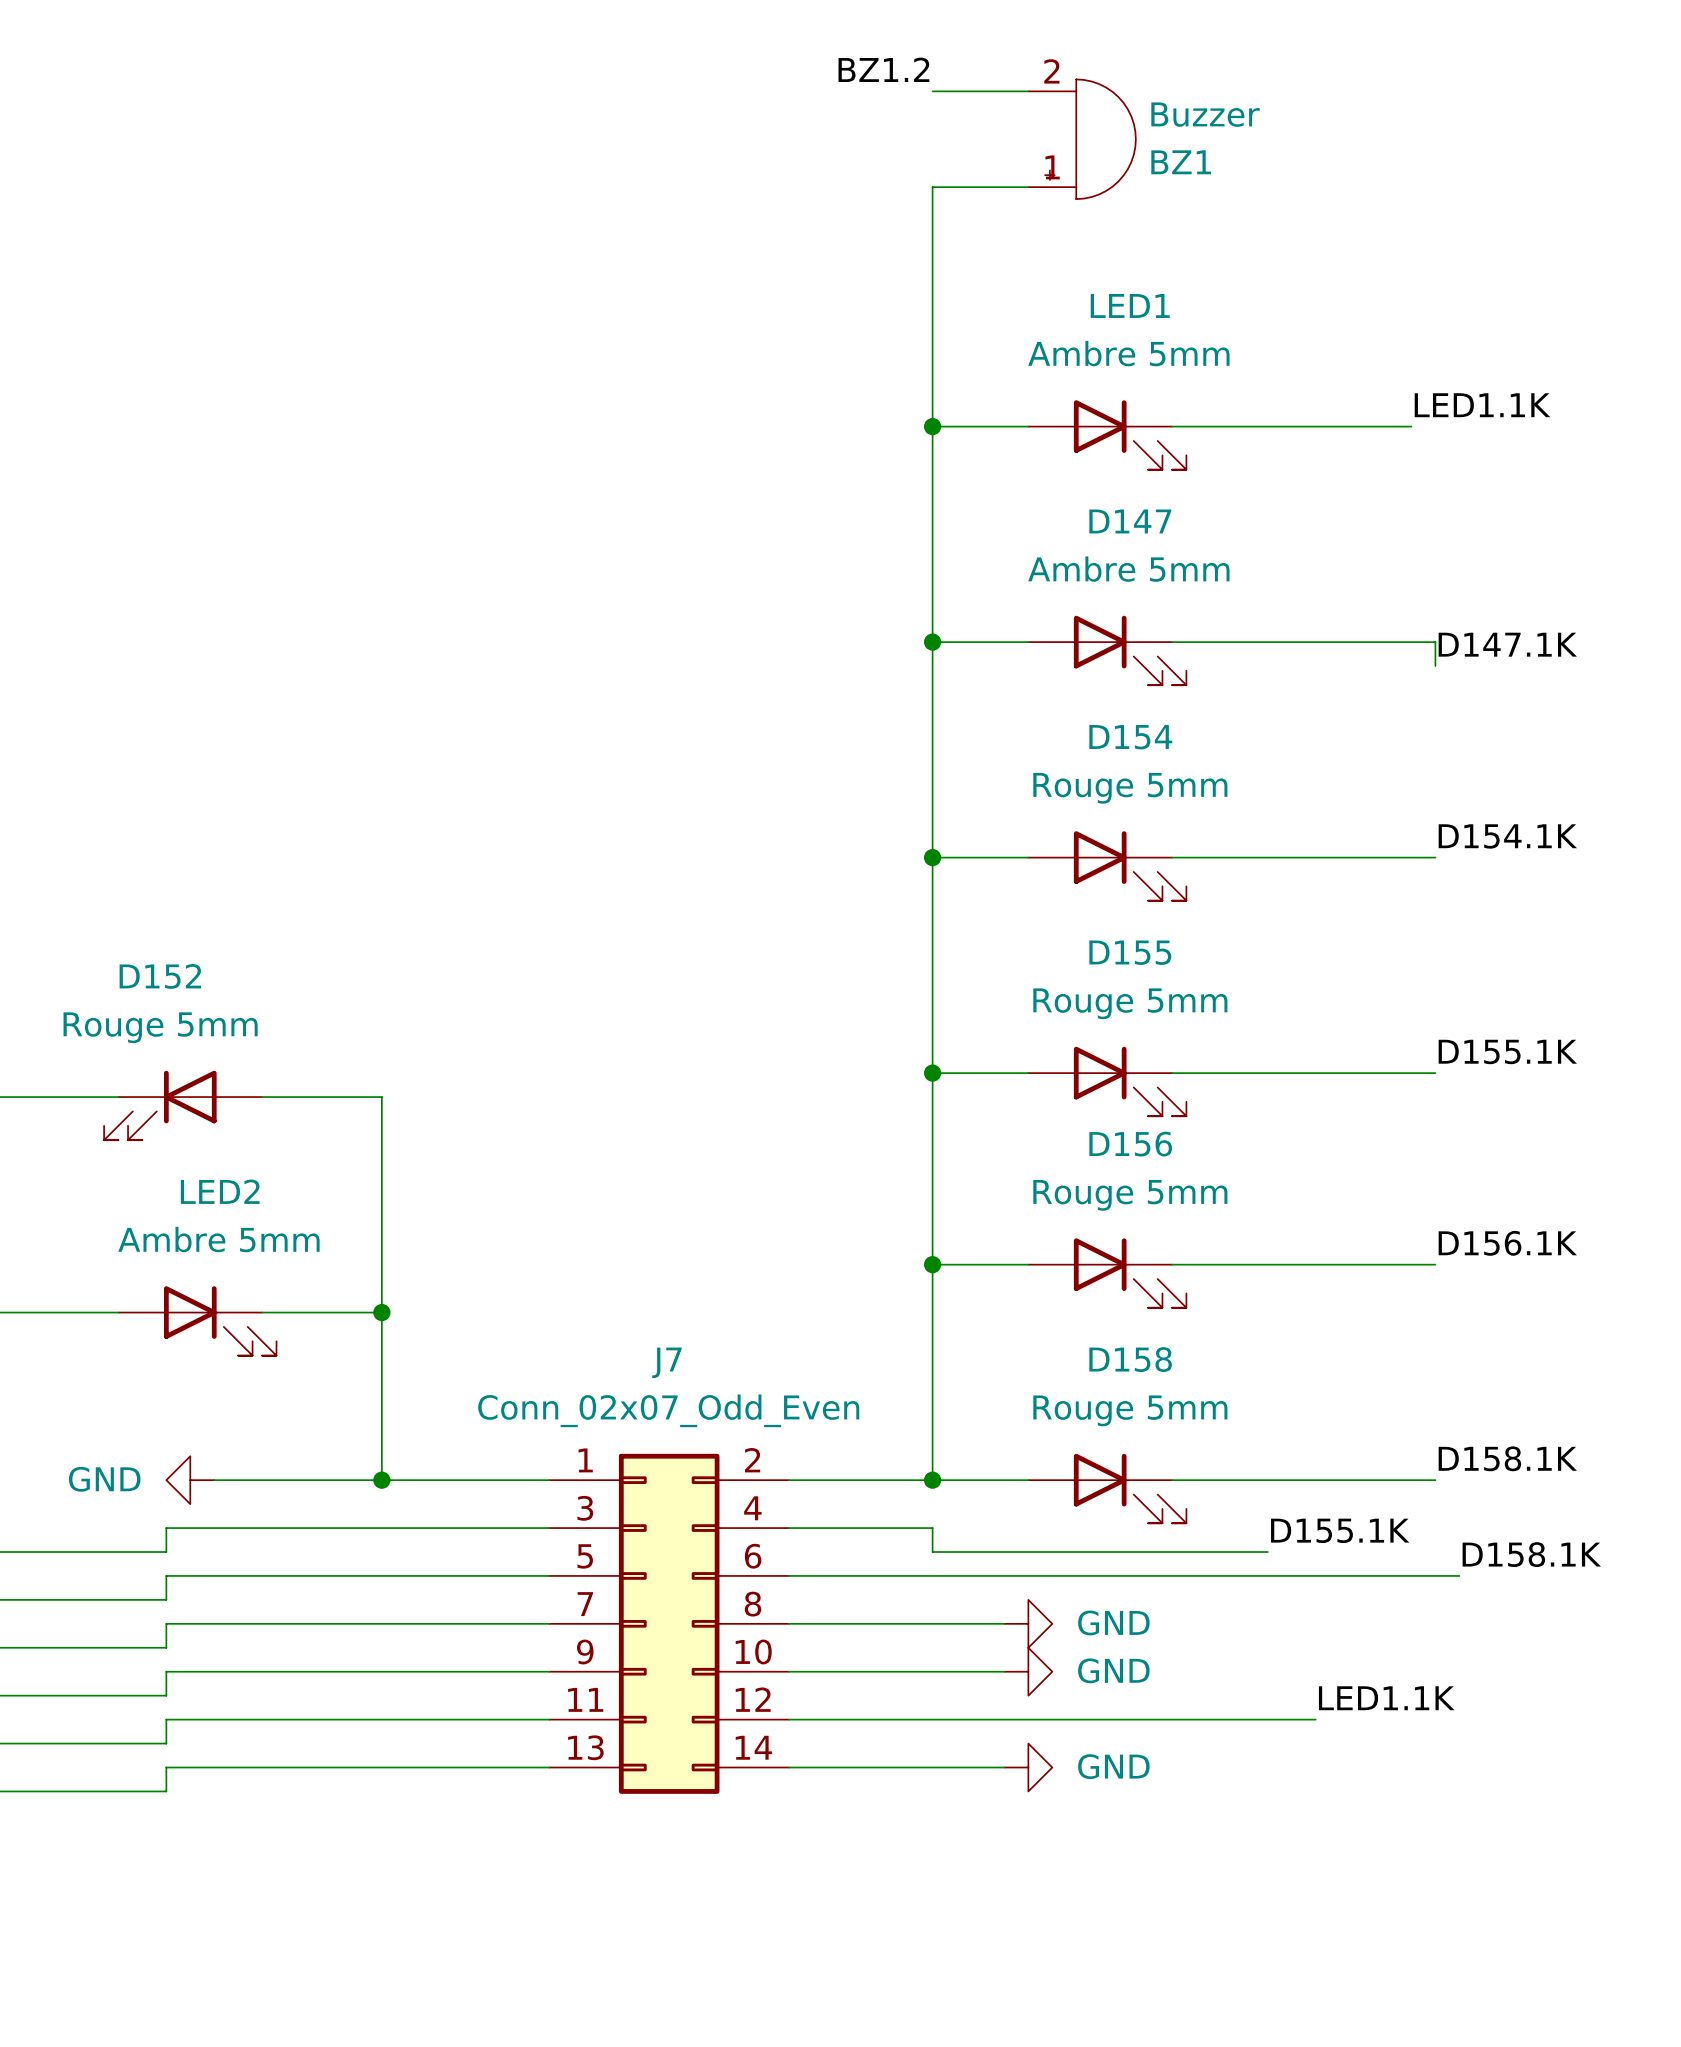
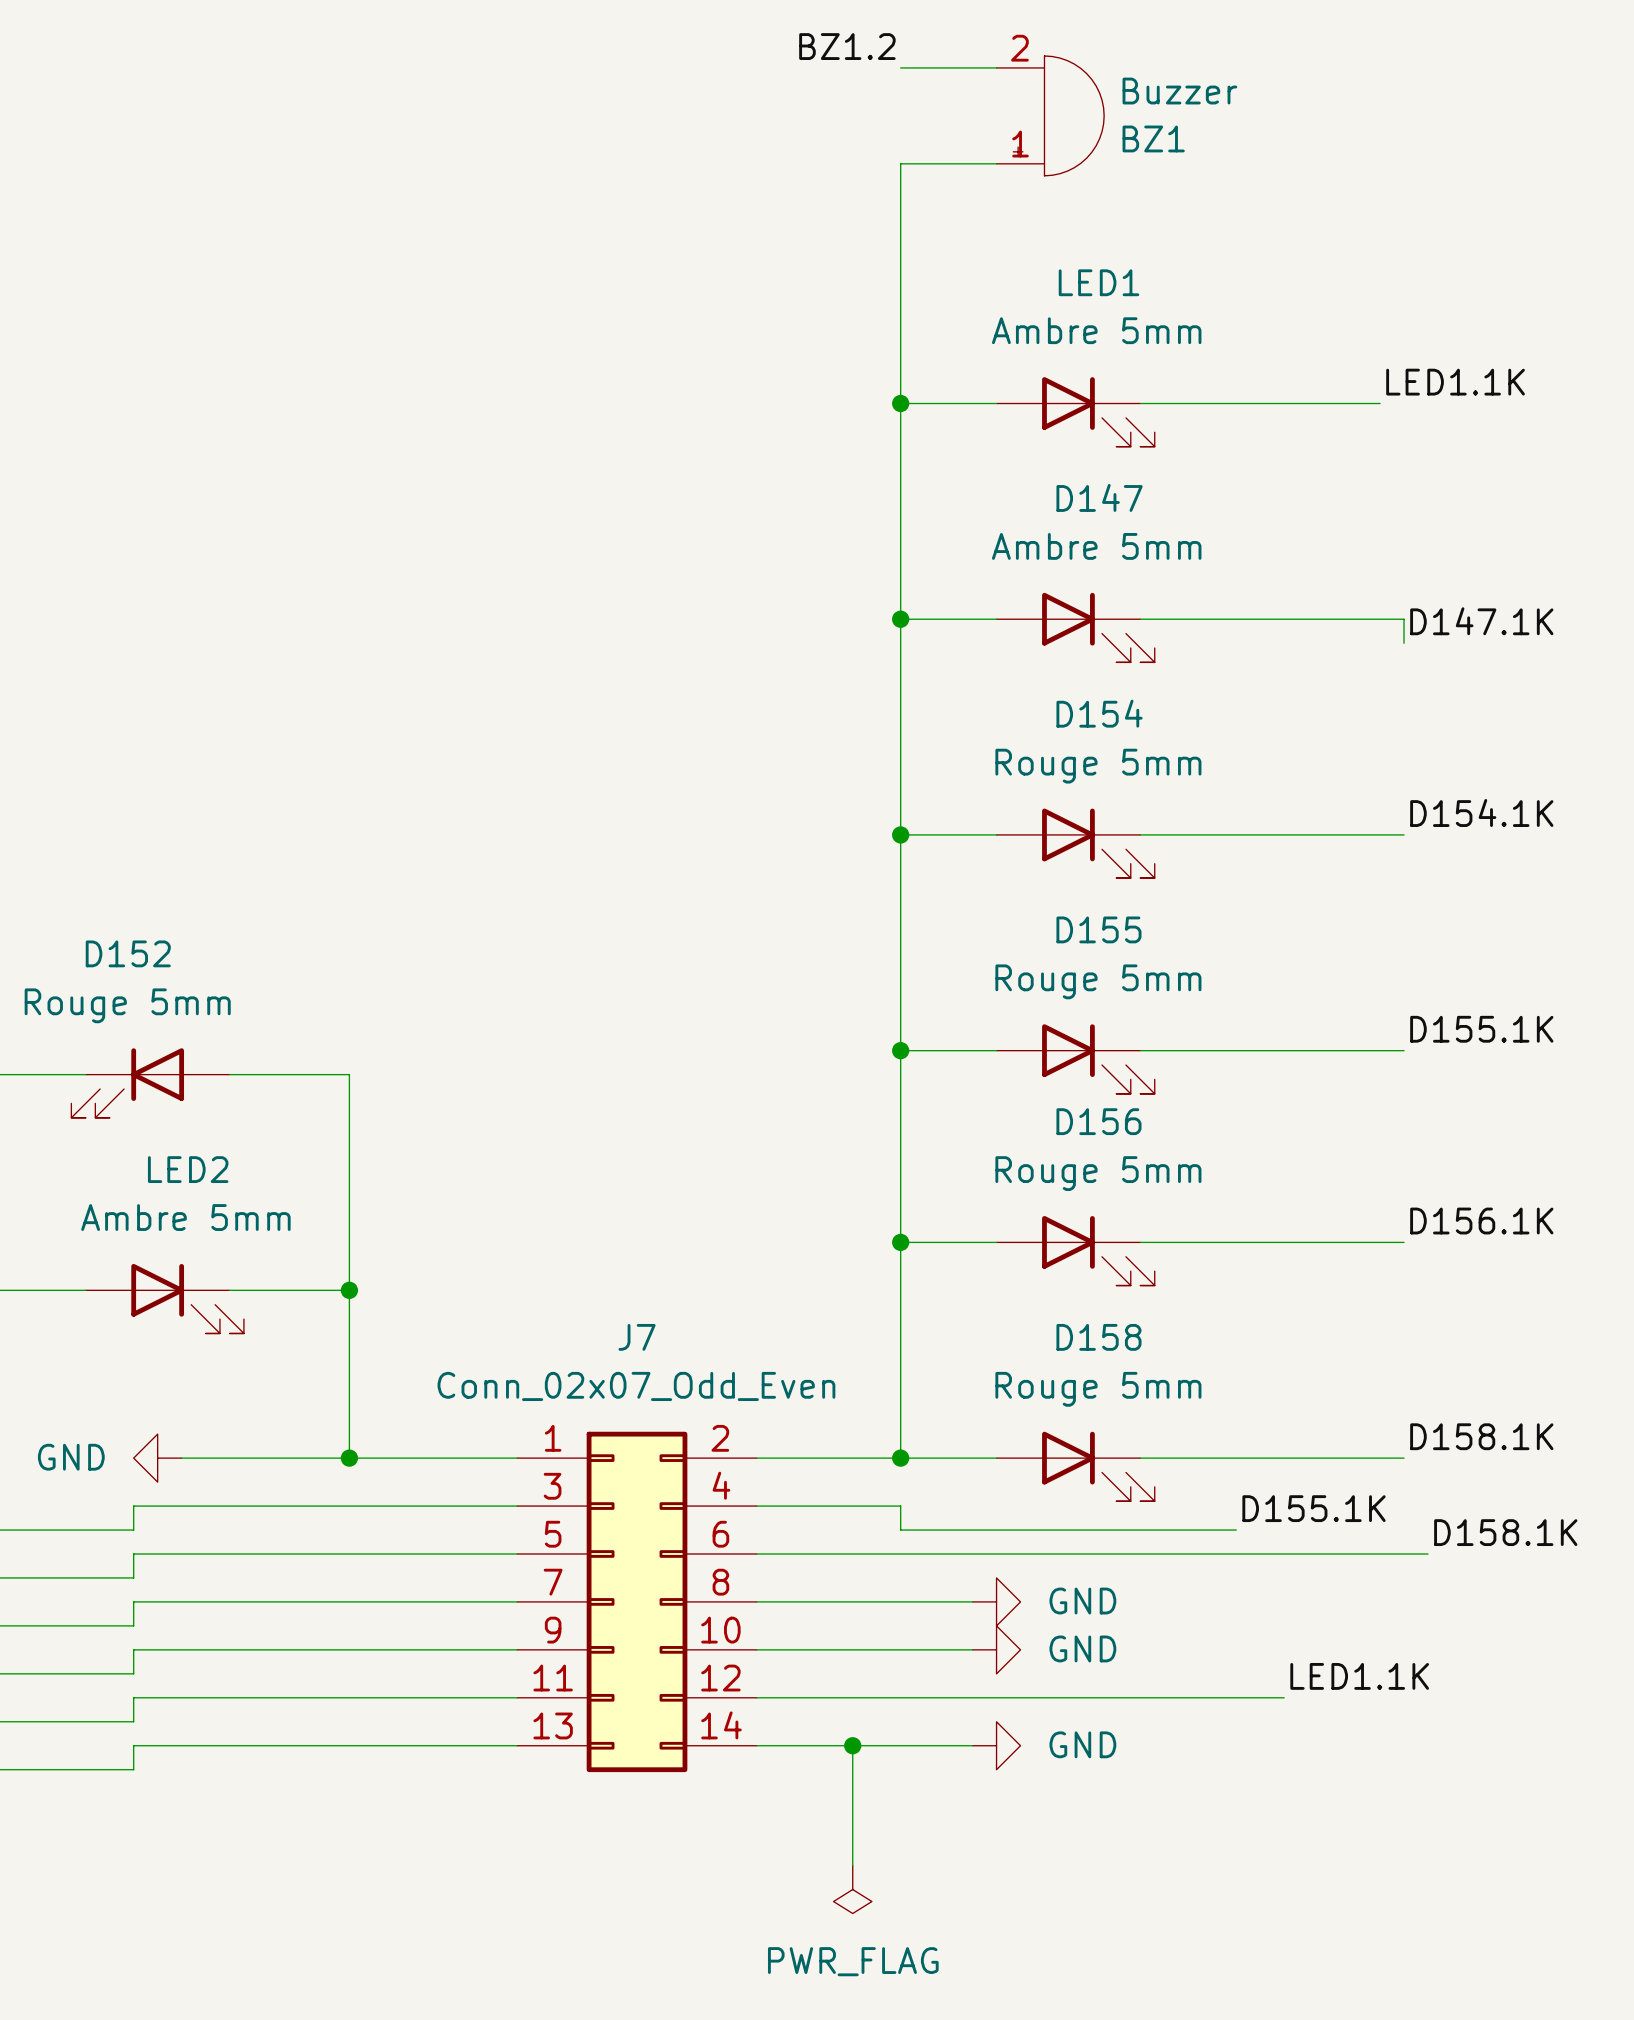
wire: none -> (852, 1745) (852, 1865)
junction: none -> (852, 1745)
power symbol: none -> PWR_FLAG (852, 1889)

